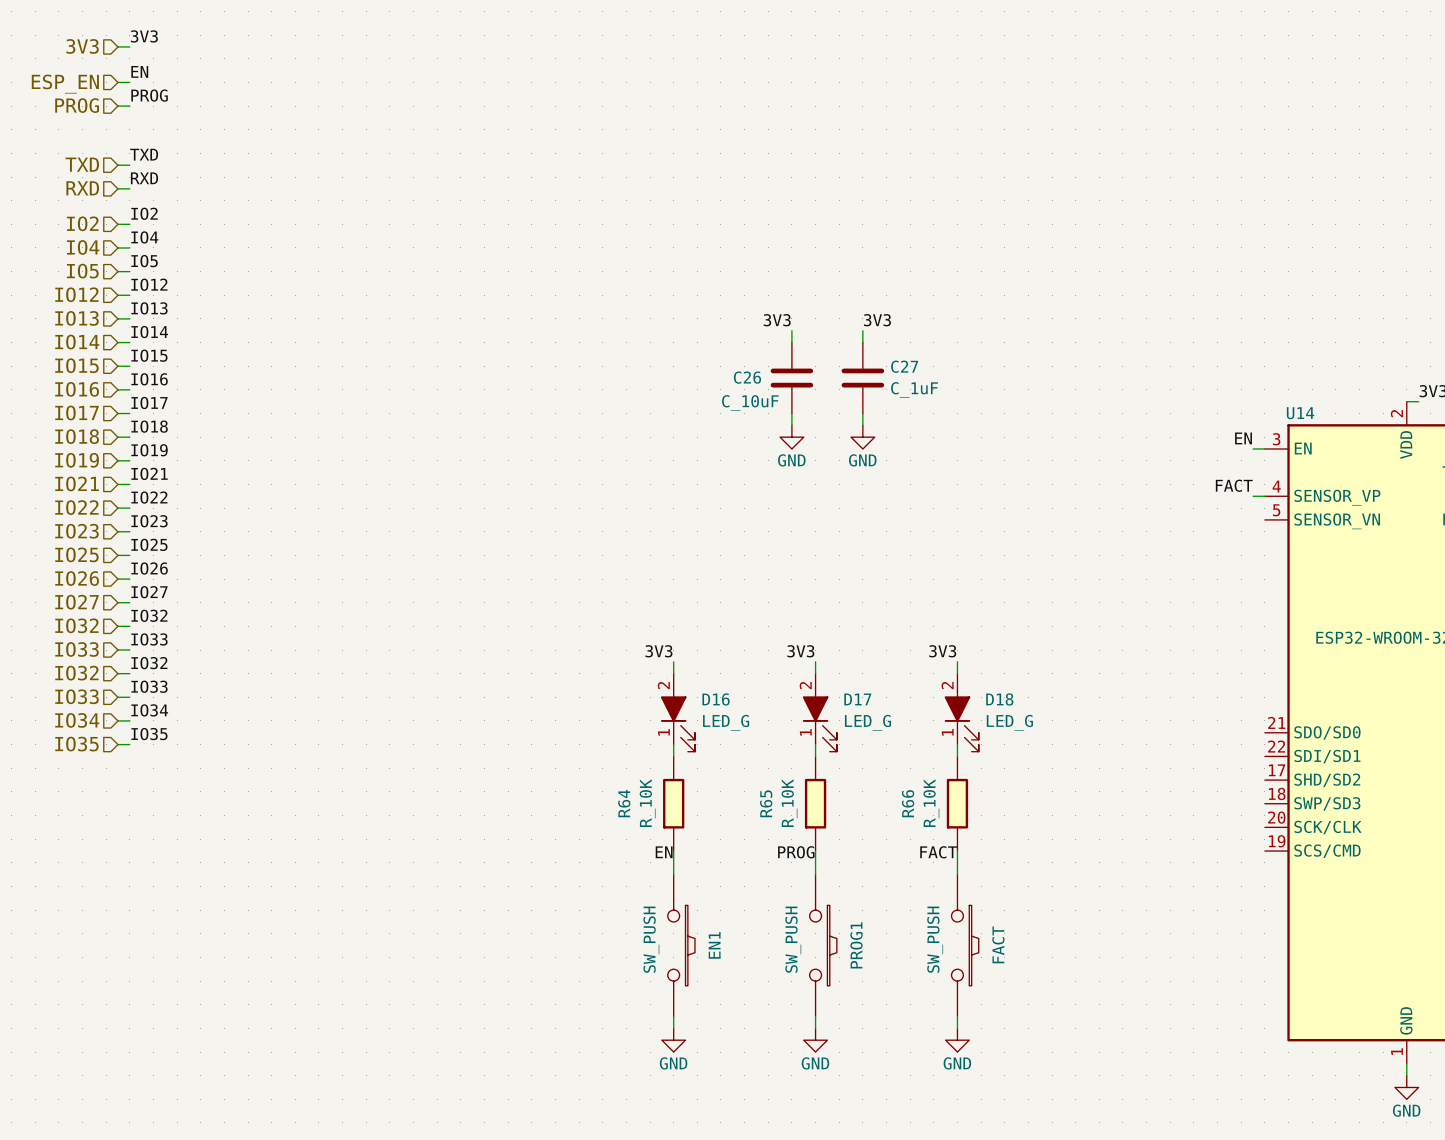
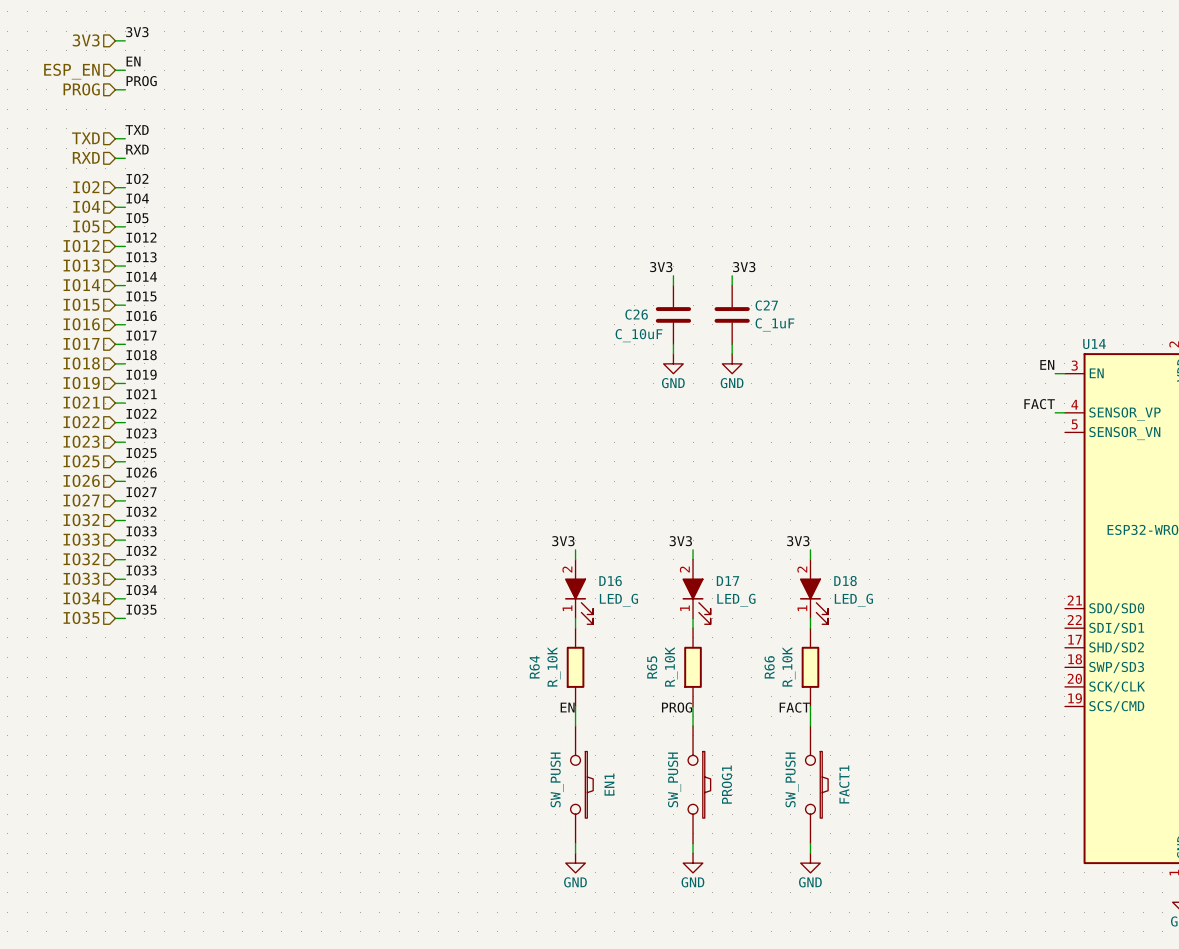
FACT name: FACT (998, 944) -> FACT1 (844, 784)

